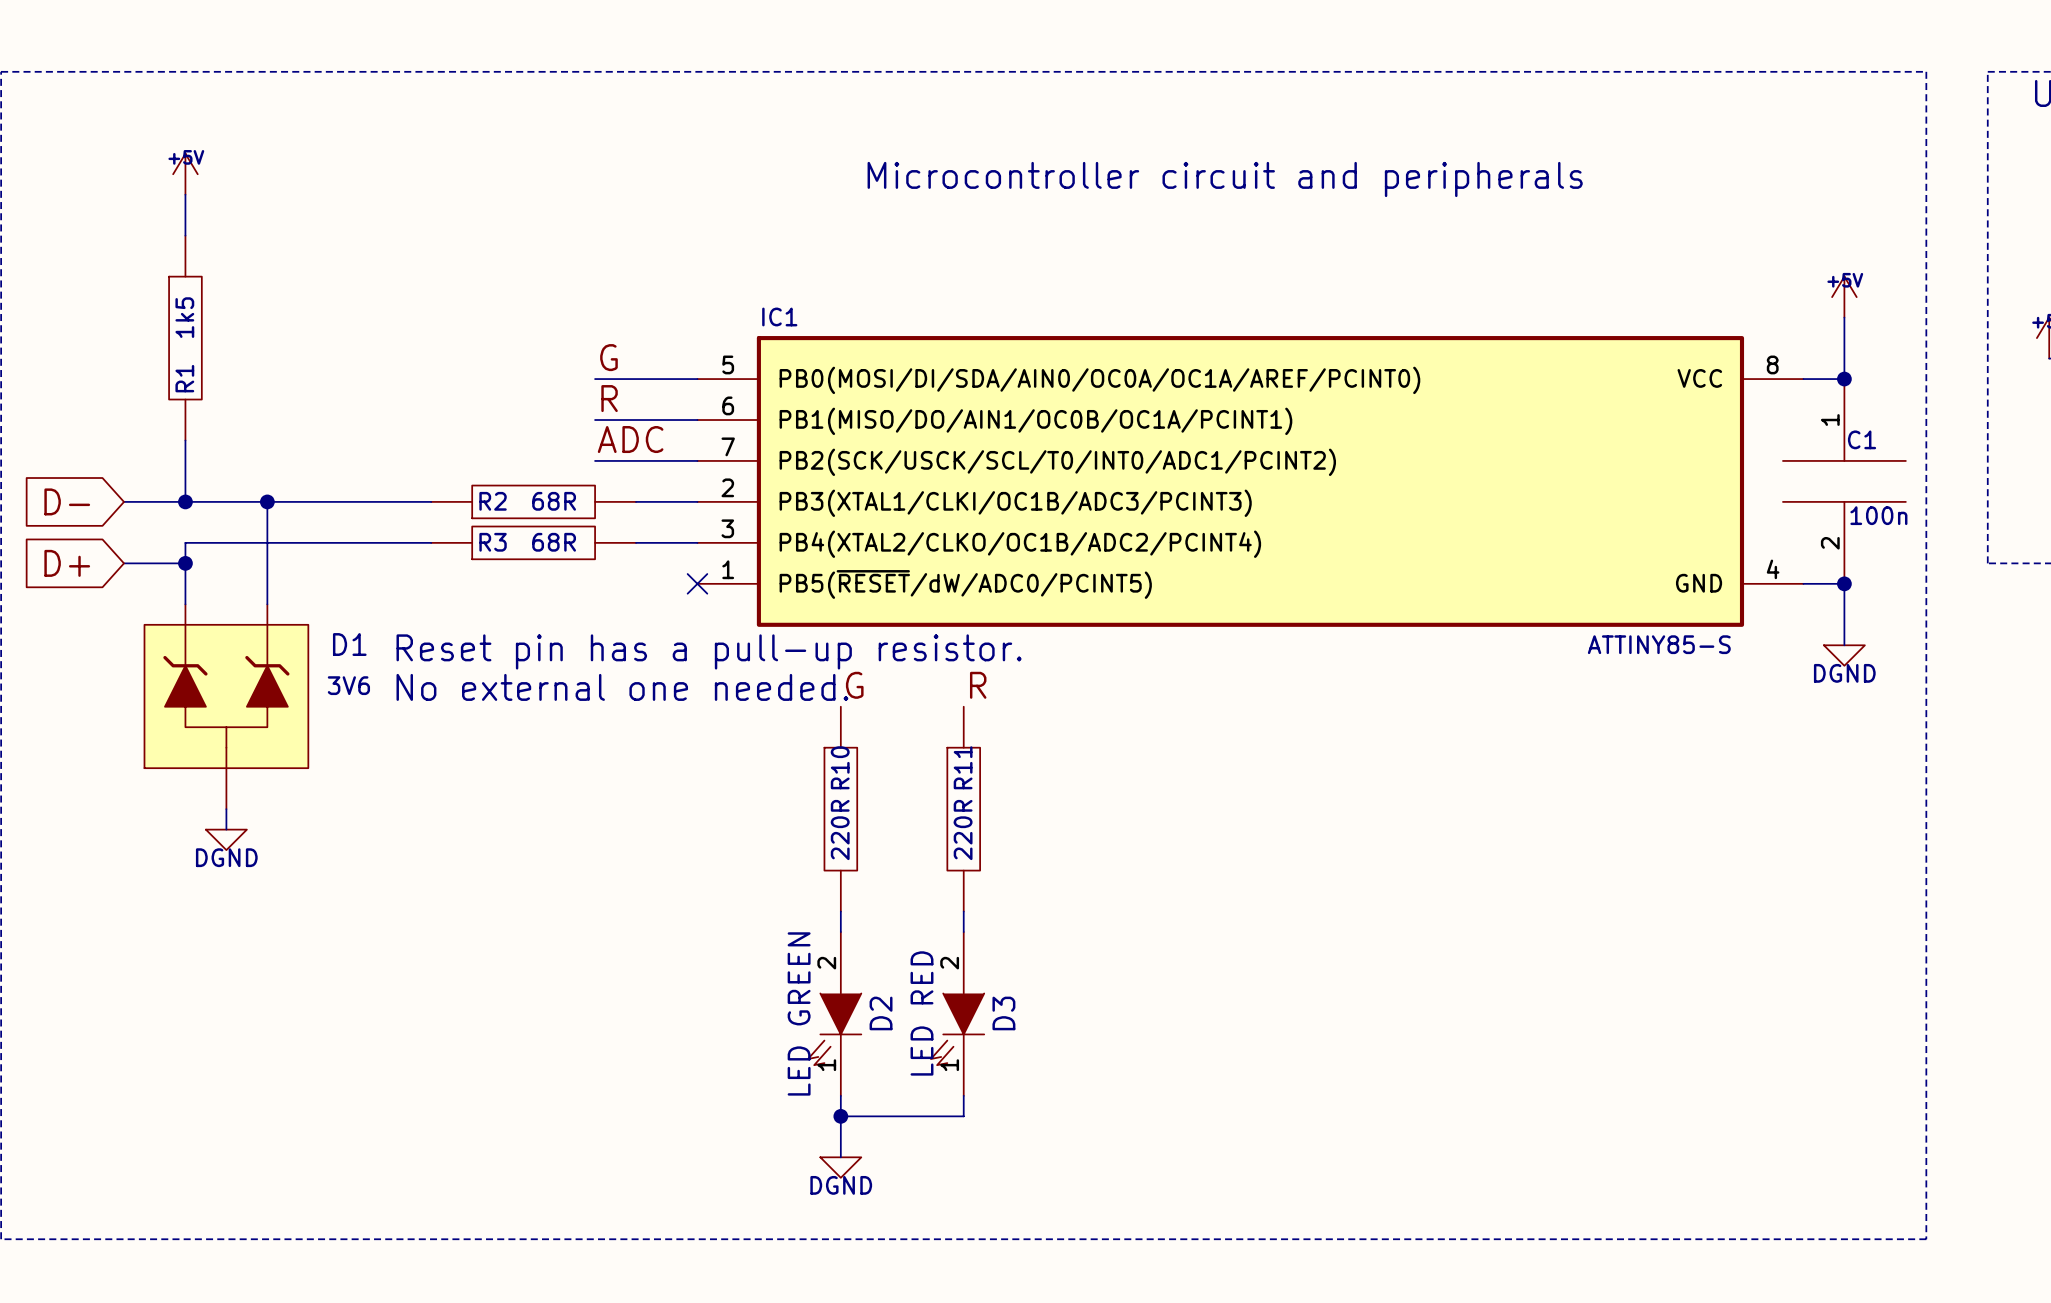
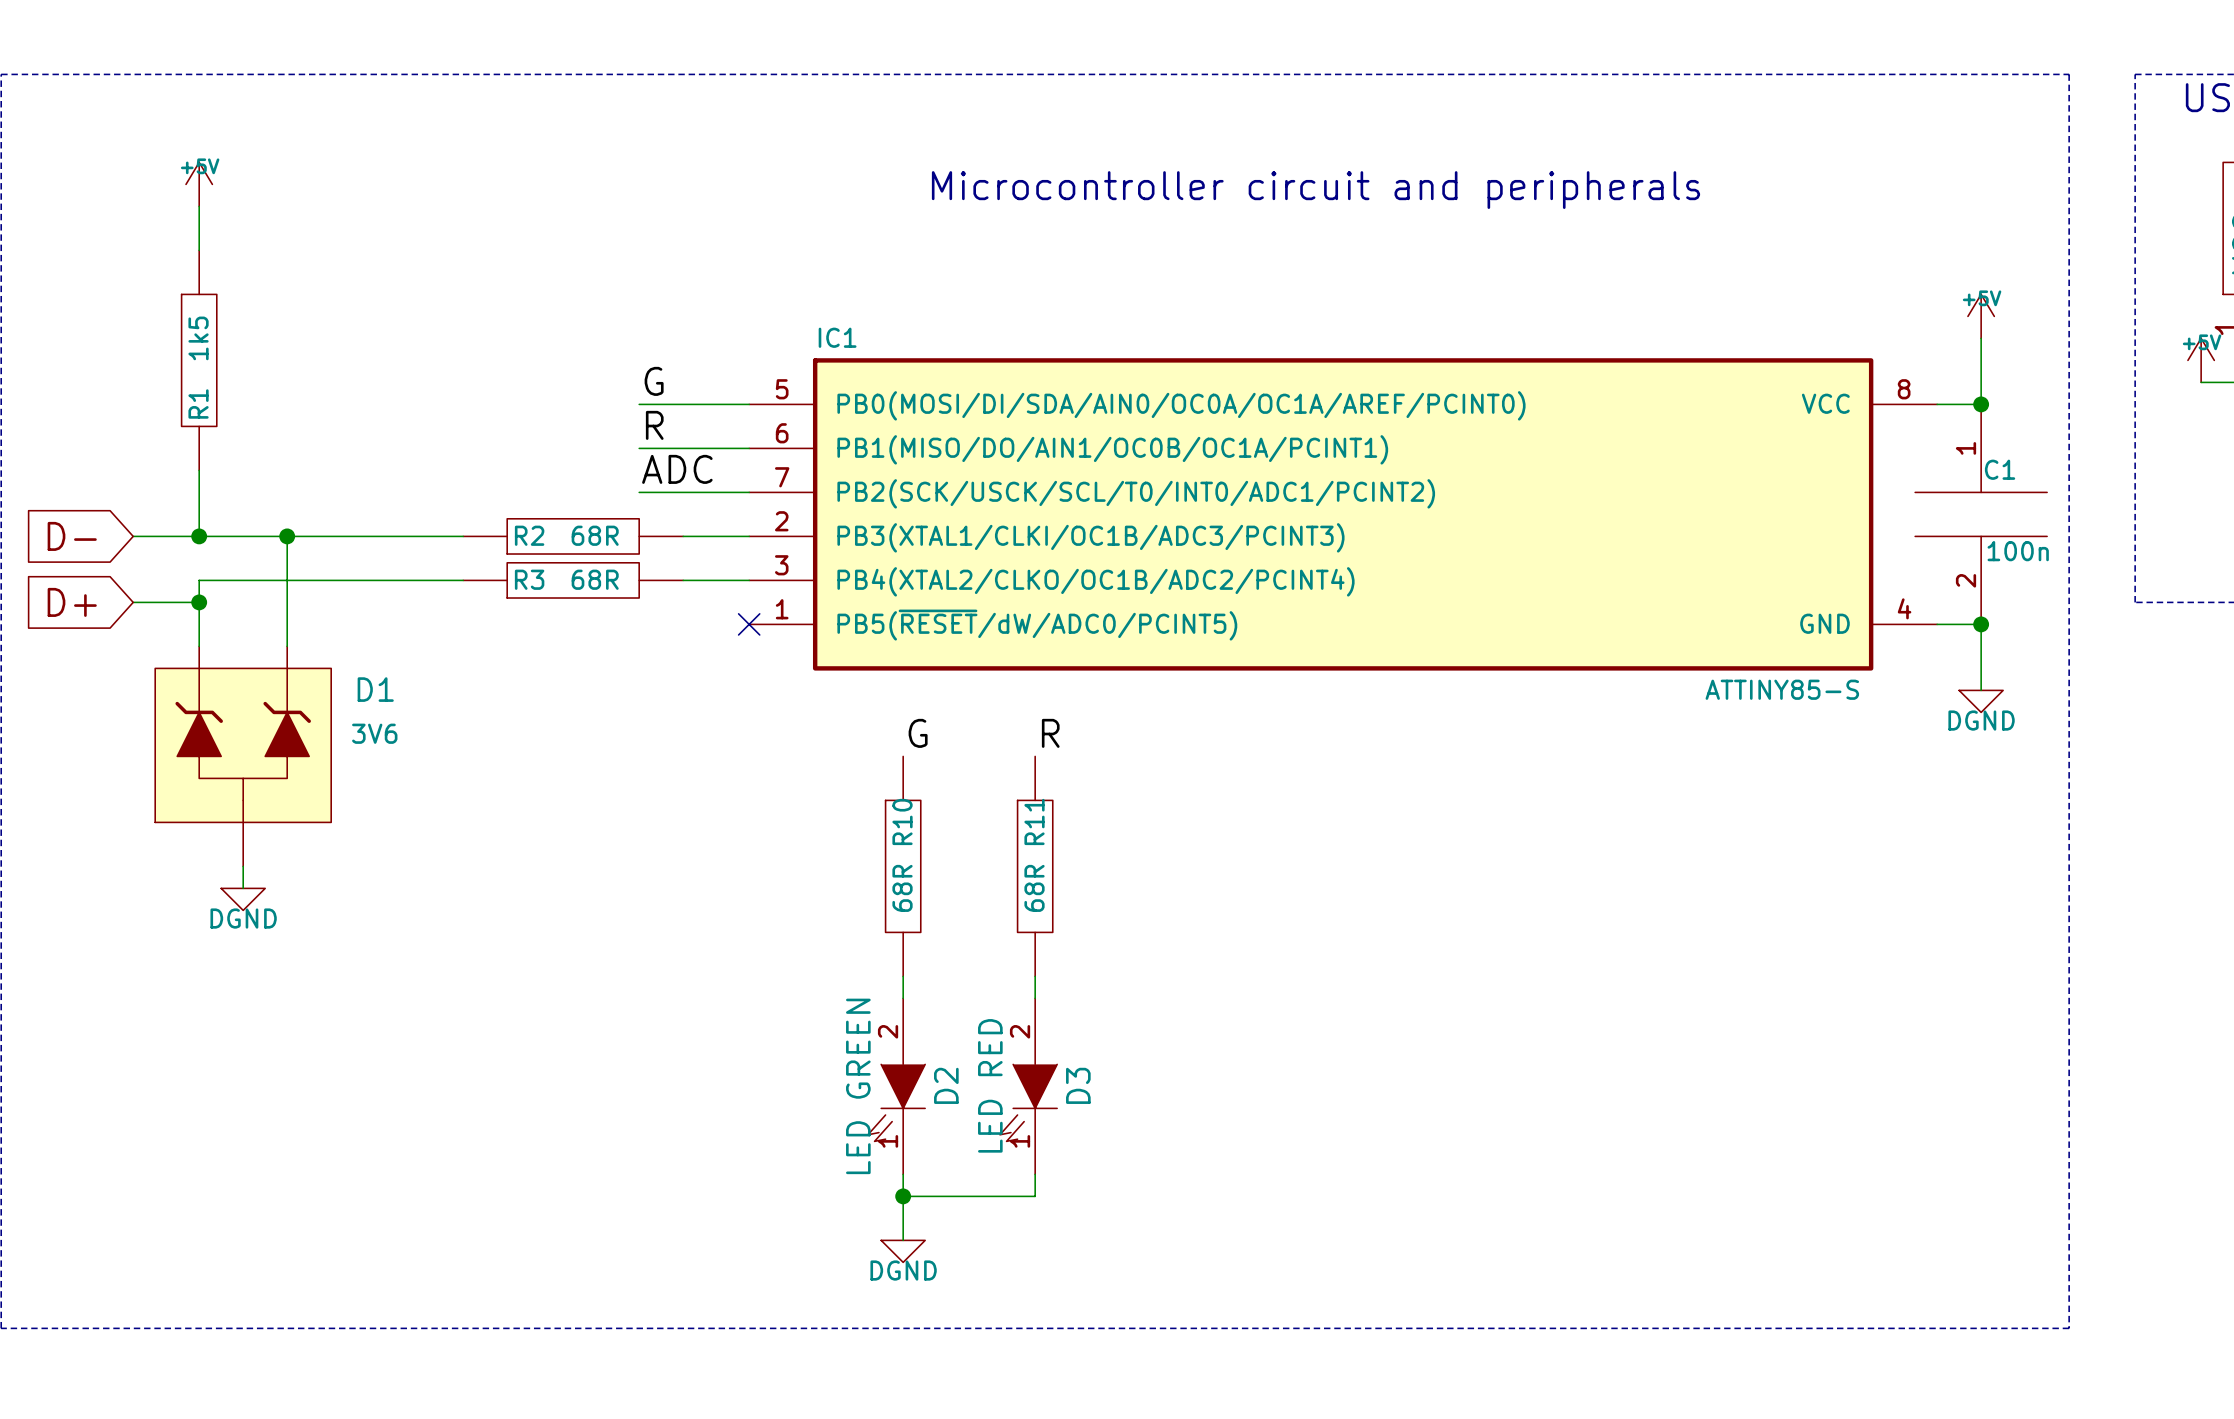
text: Reset pin has a pull-up resistor. (709, 651) -> none
text: No external one needed. (622, 687) -> none
R10 value: 220R (840, 830) -> 68R (902, 888)
R11 value: 220R (963, 830) -> 68R (1034, 888)

